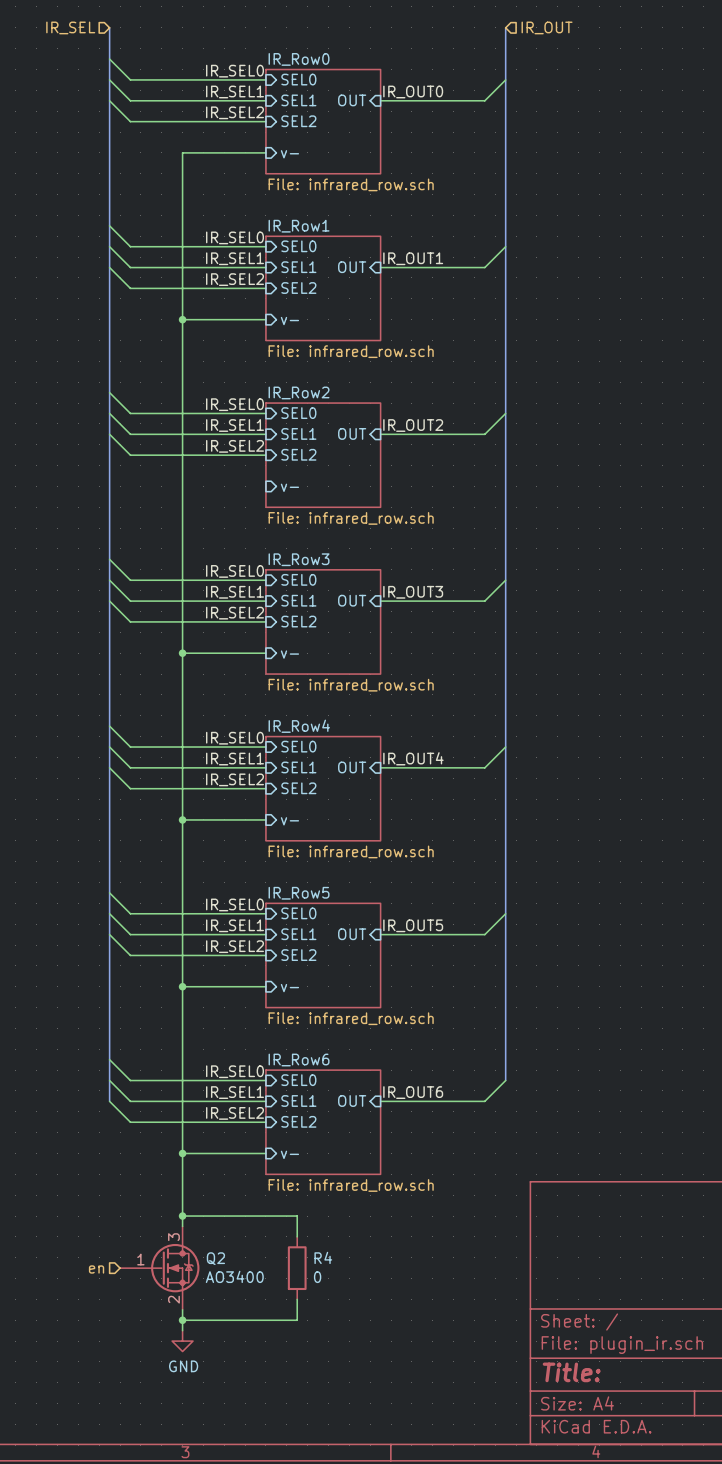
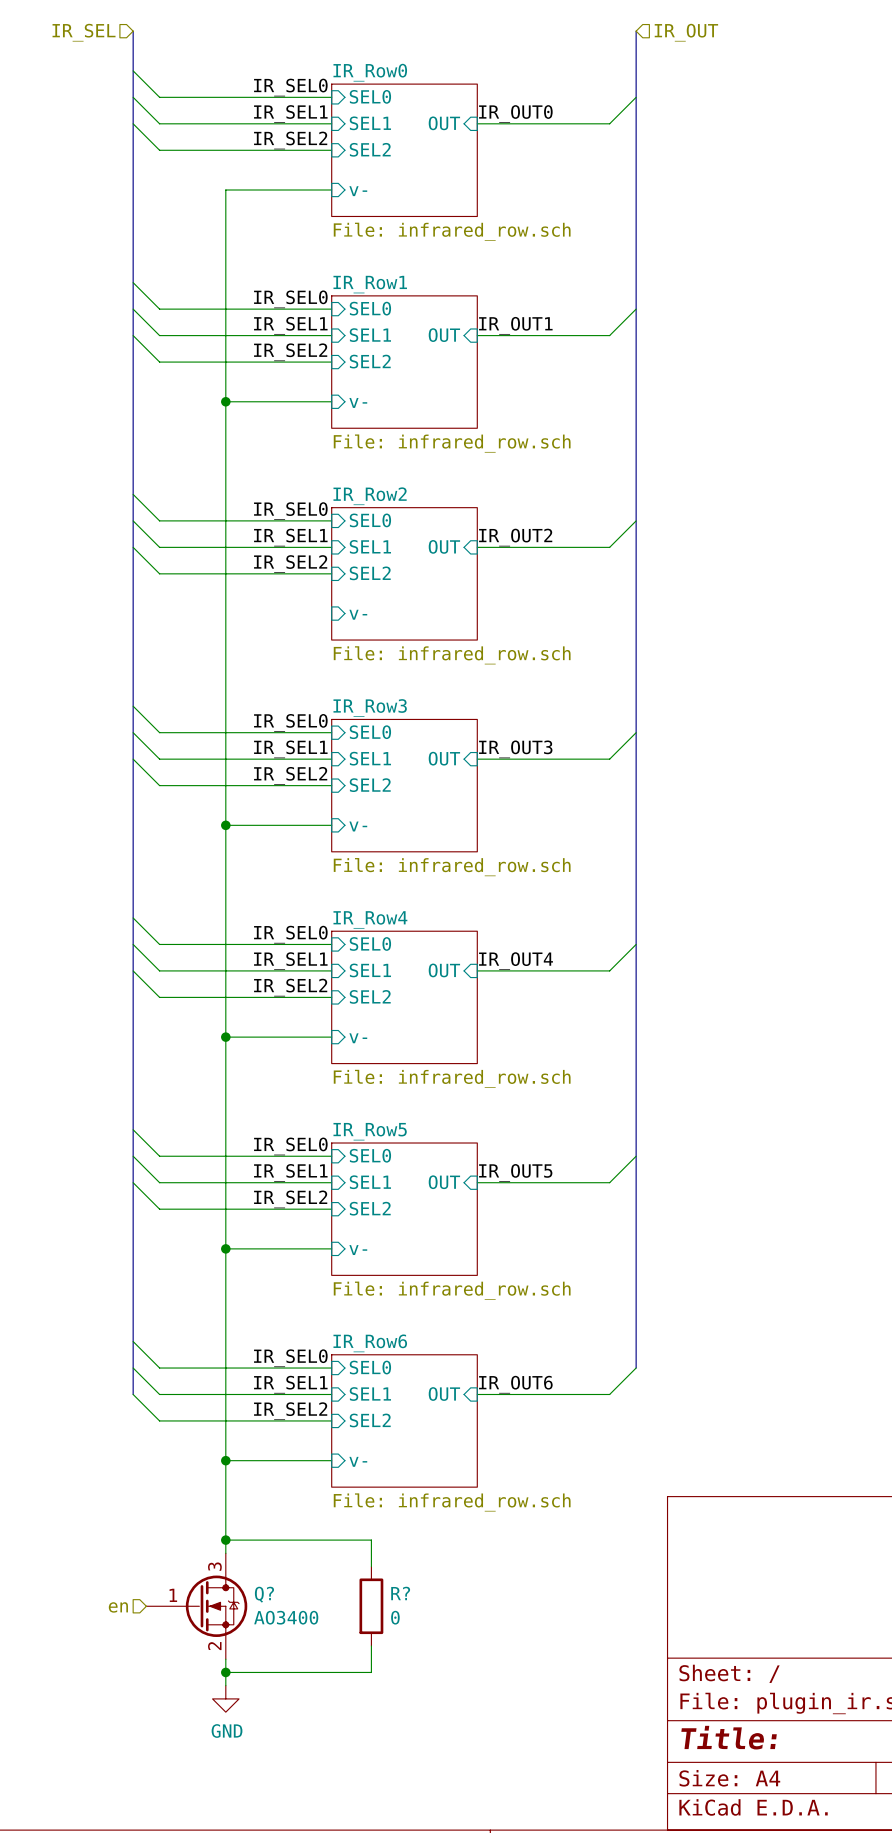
R4 name: R4 (323, 1257) -> R? (400, 1593)
Q2 name: Q2 (215, 1258) -> Q? (264, 1594)

